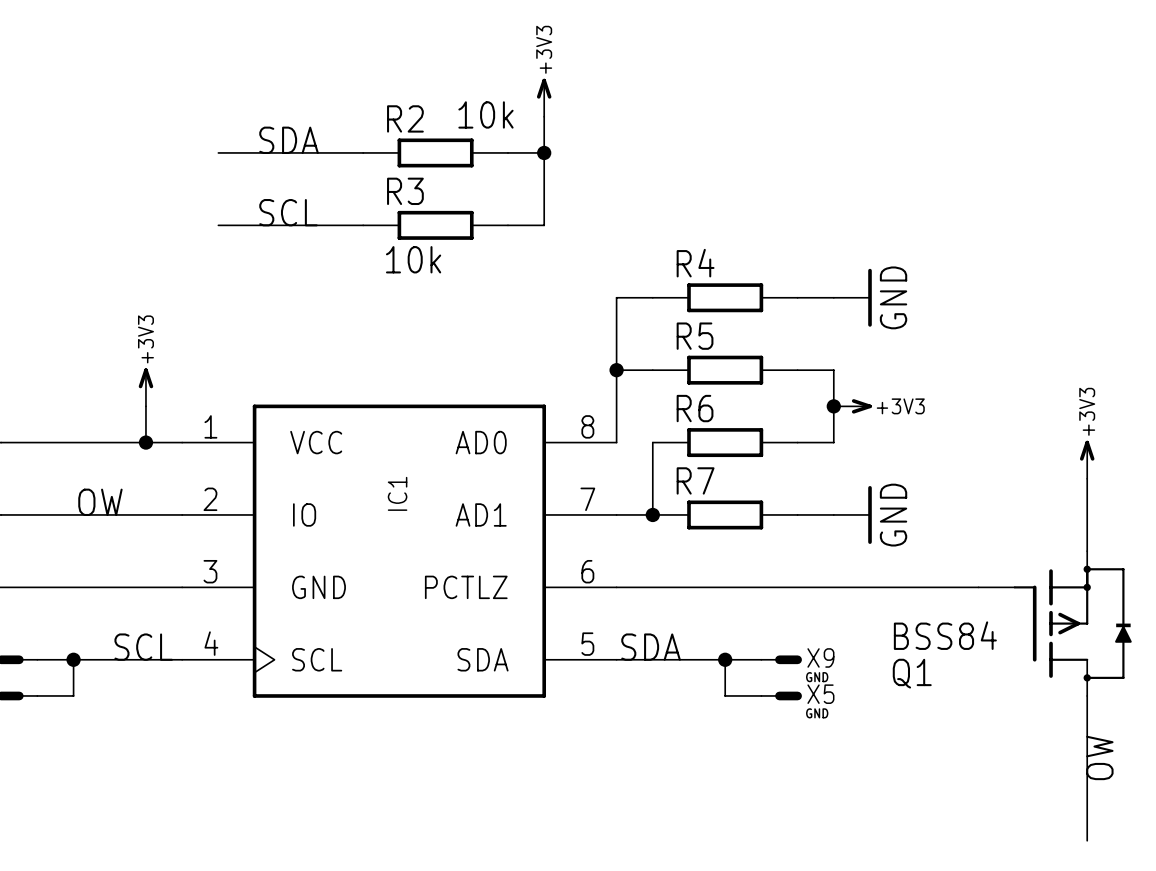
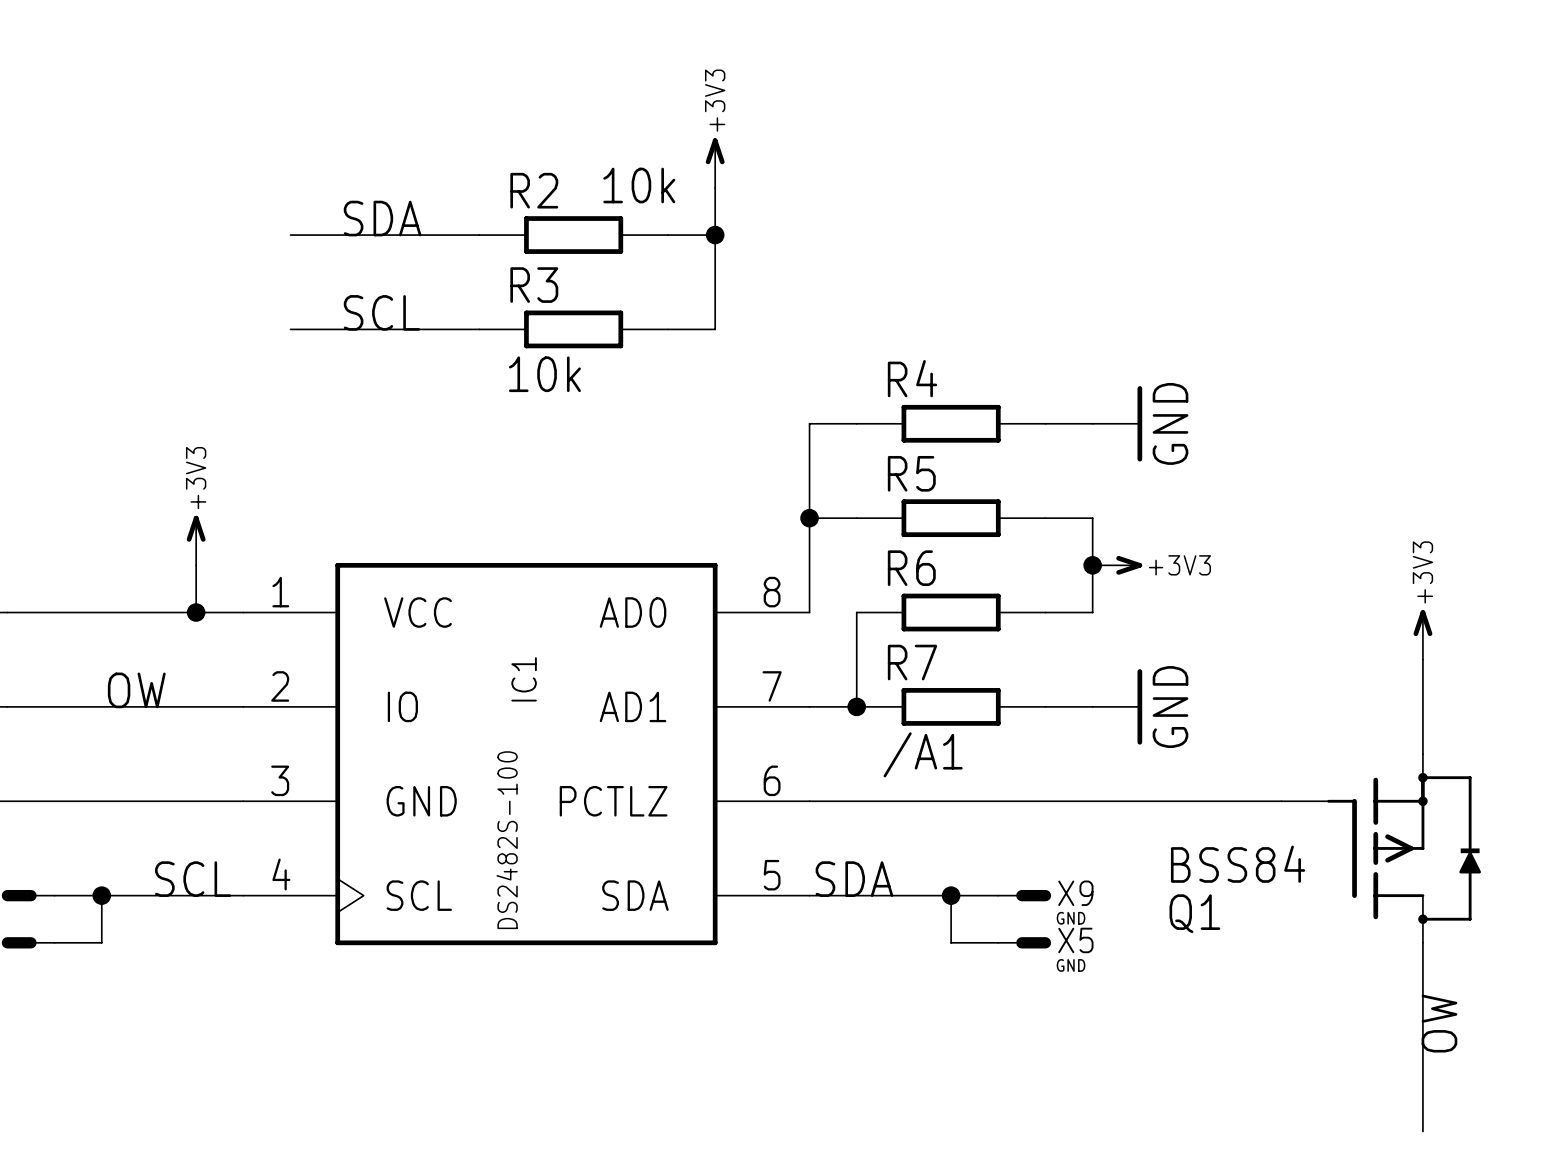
R7 value: none -> /A1 (923, 754)
IC1 value: none -> DS2482S-100 (507, 840)

